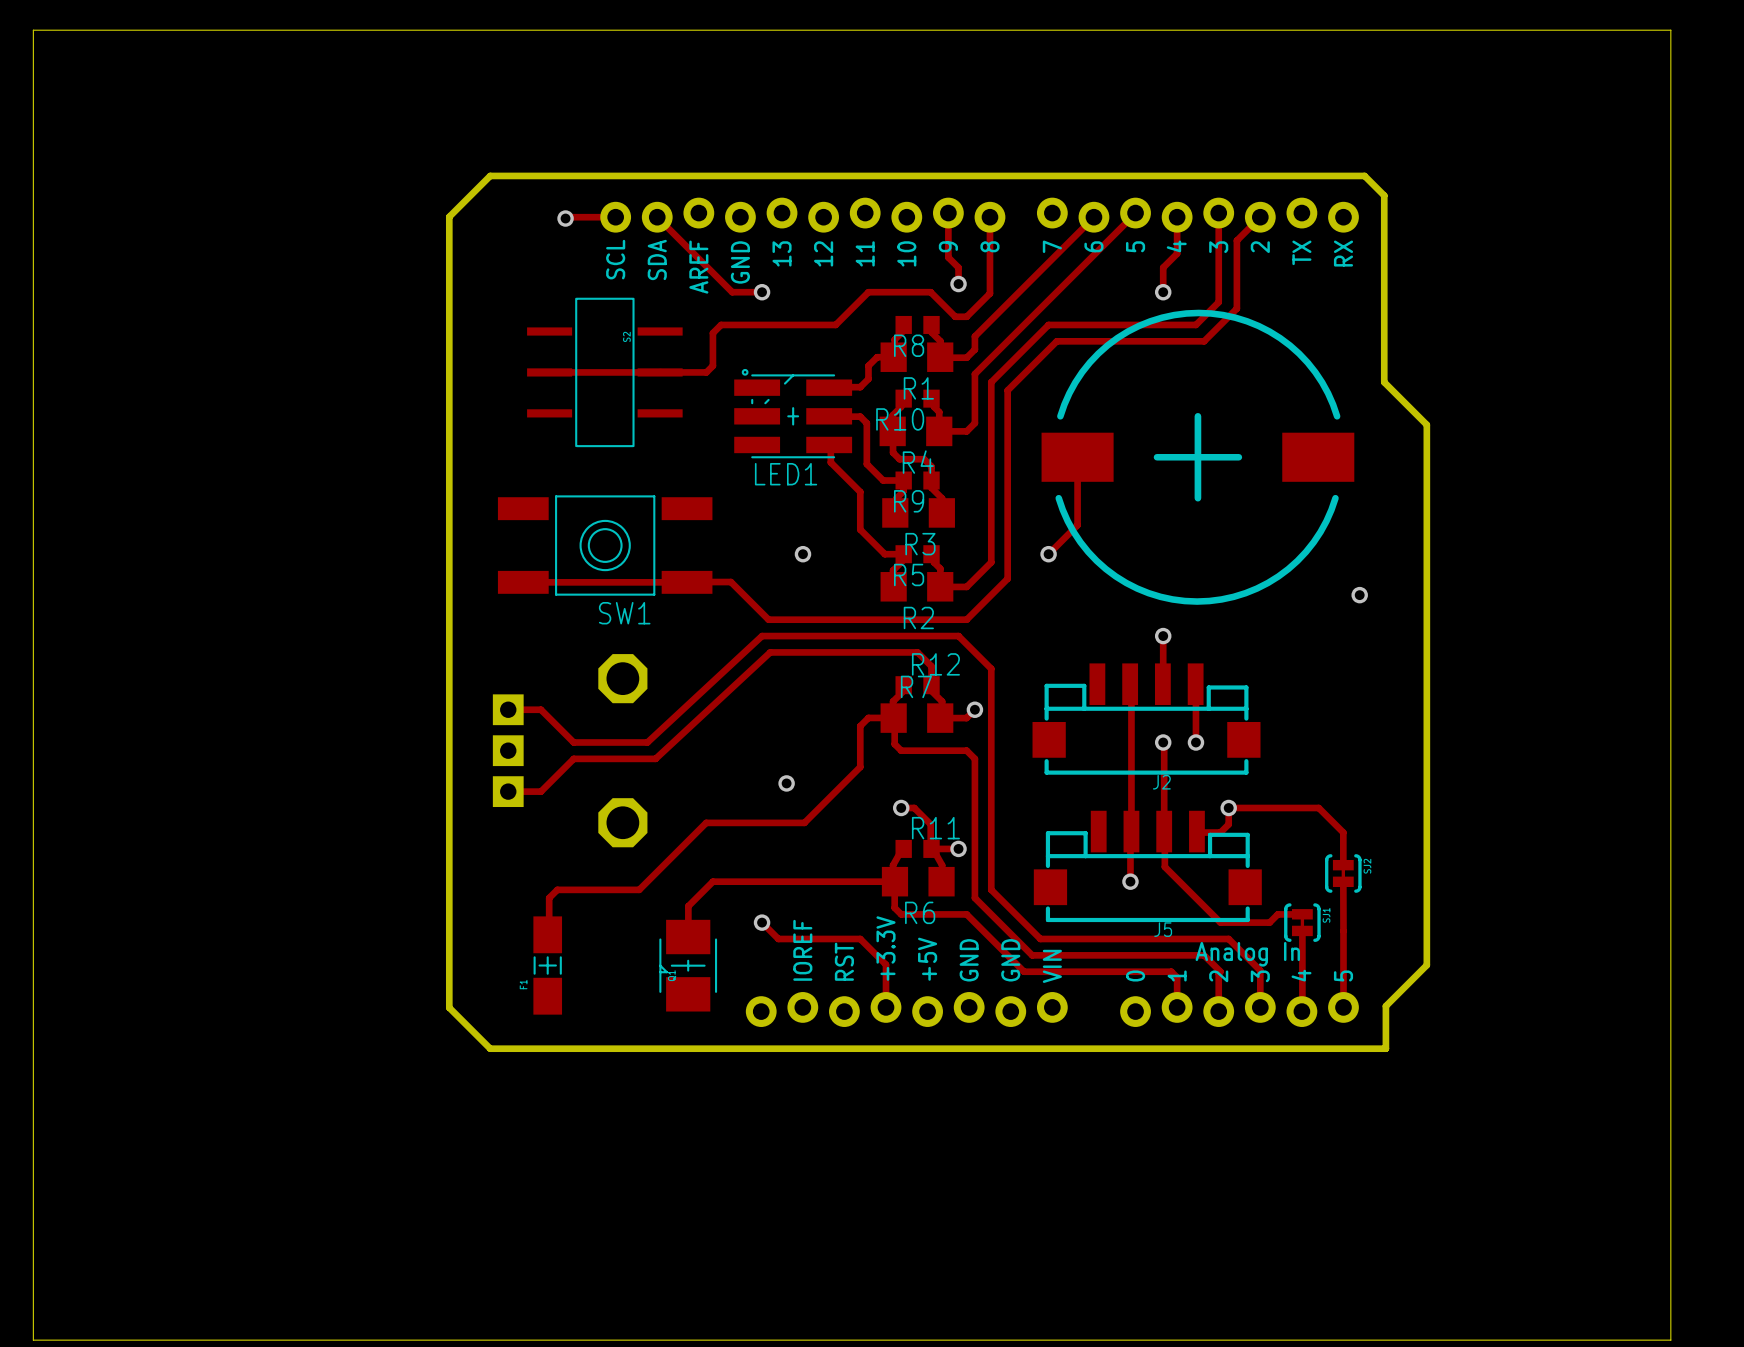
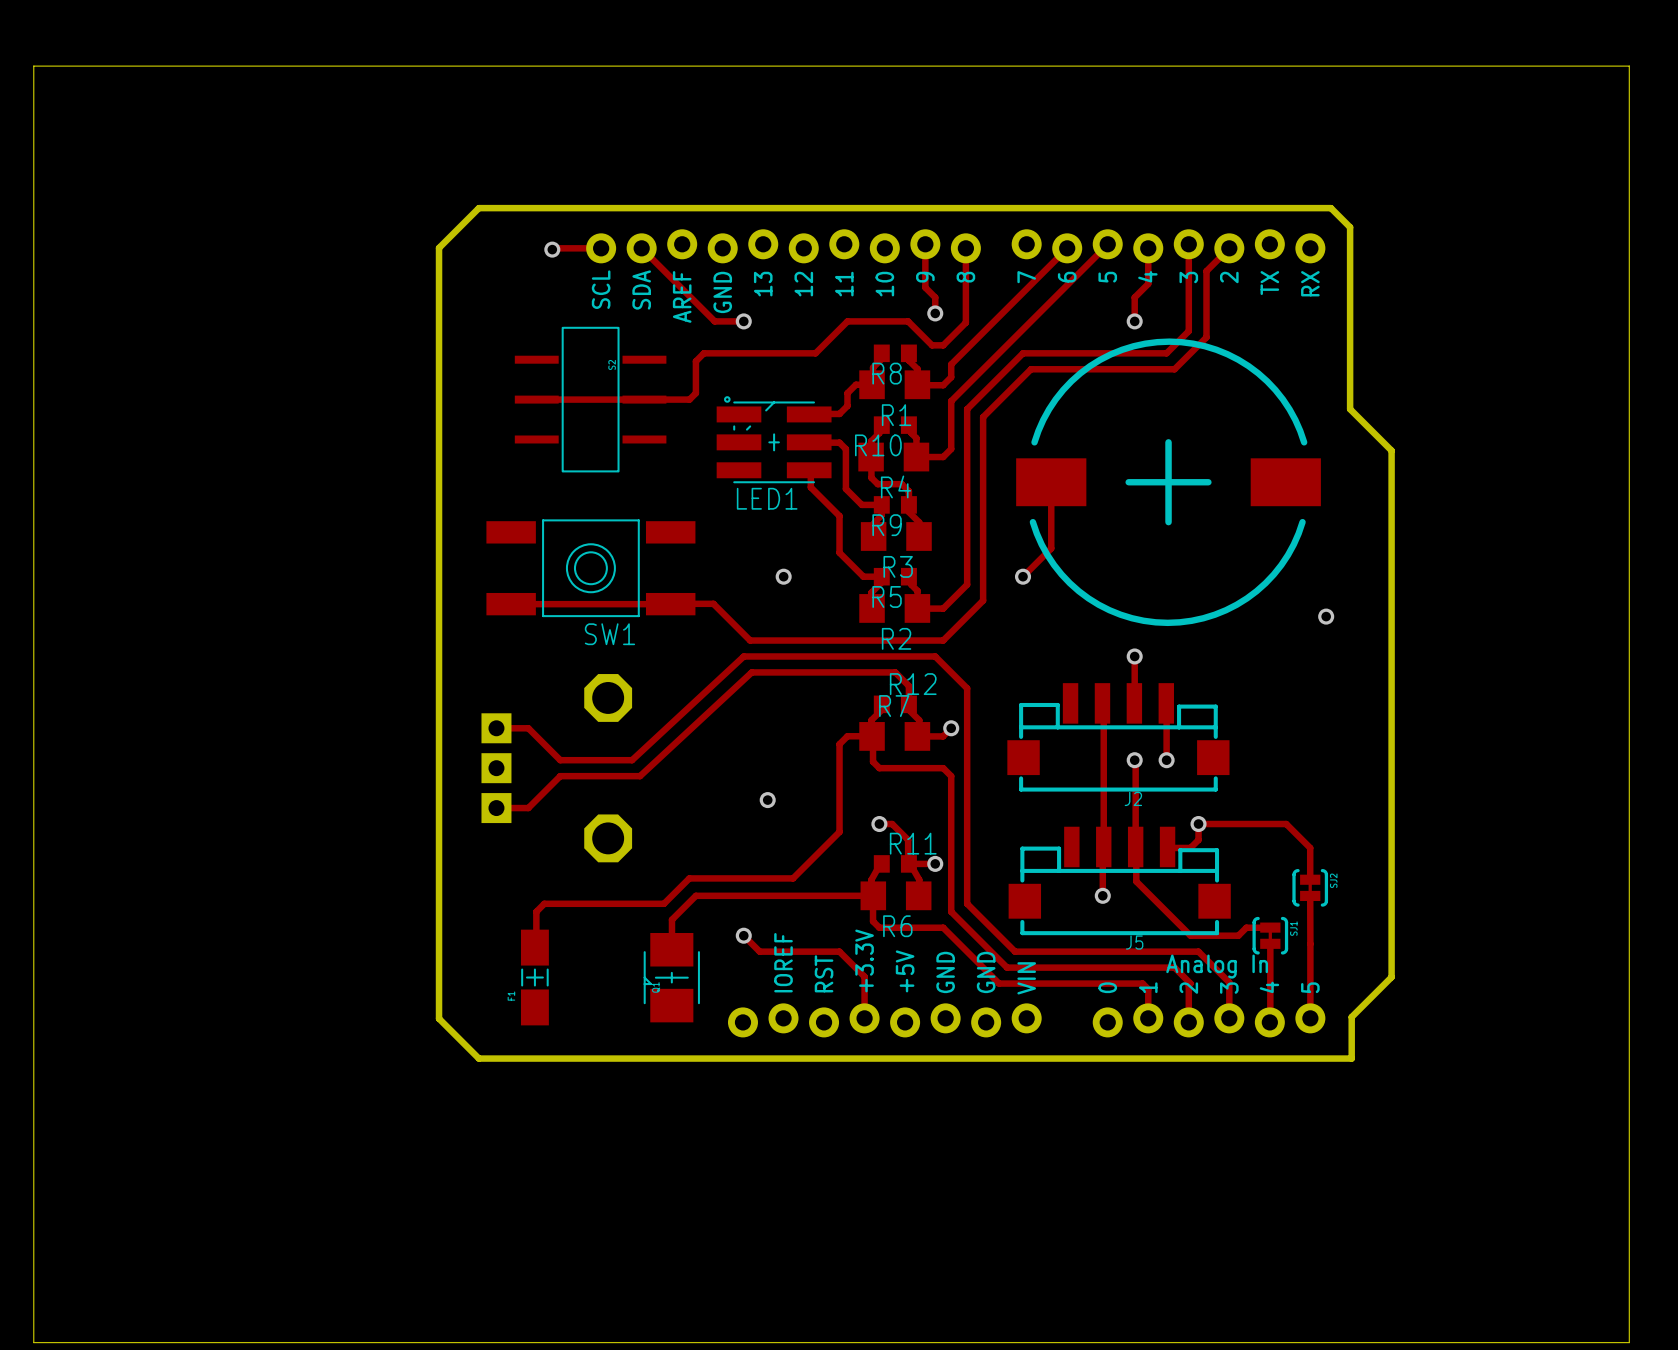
track: (860, 767) (804, 822) (706, 822) (639, 889) -> (839, 784) (839, 831) (793, 878) (689, 878) (664, 903) (624, 903)

